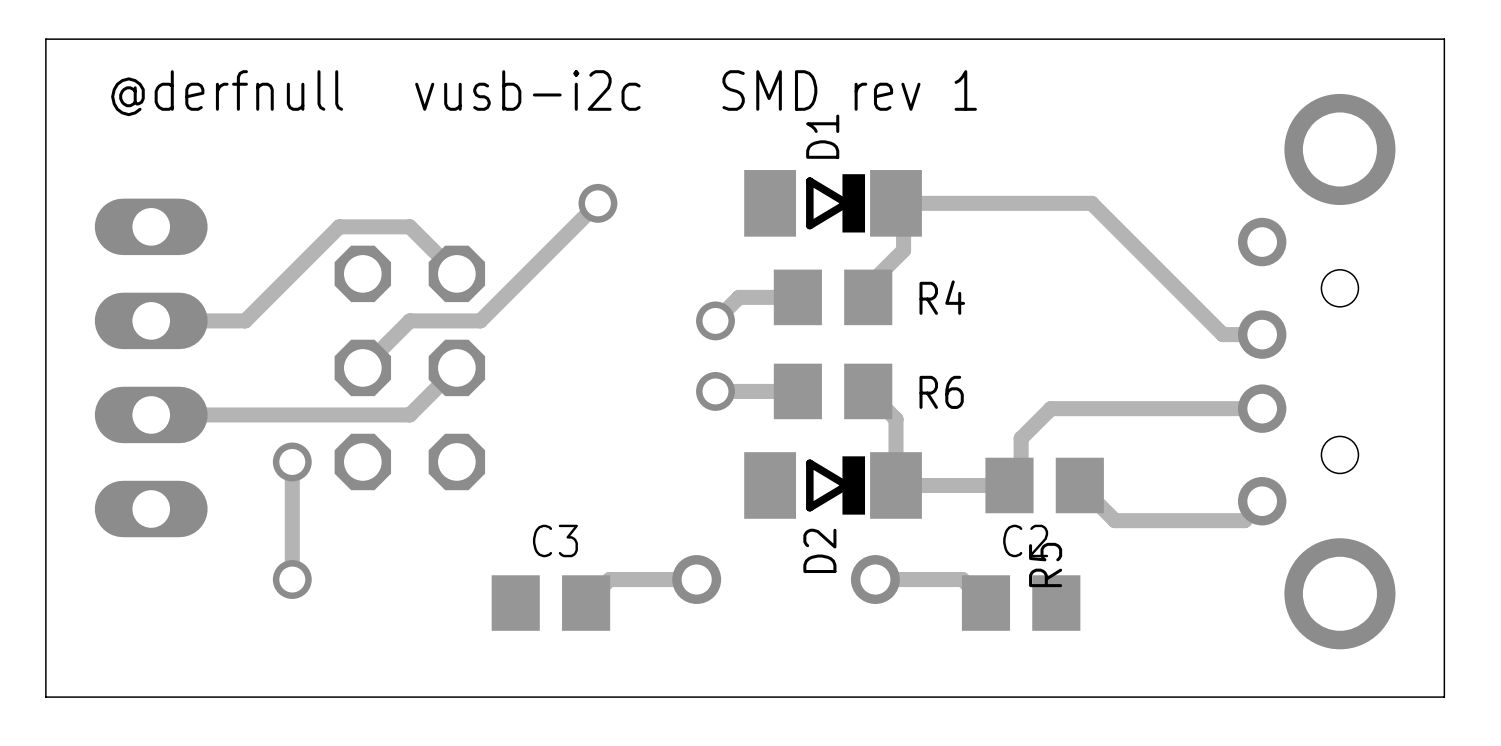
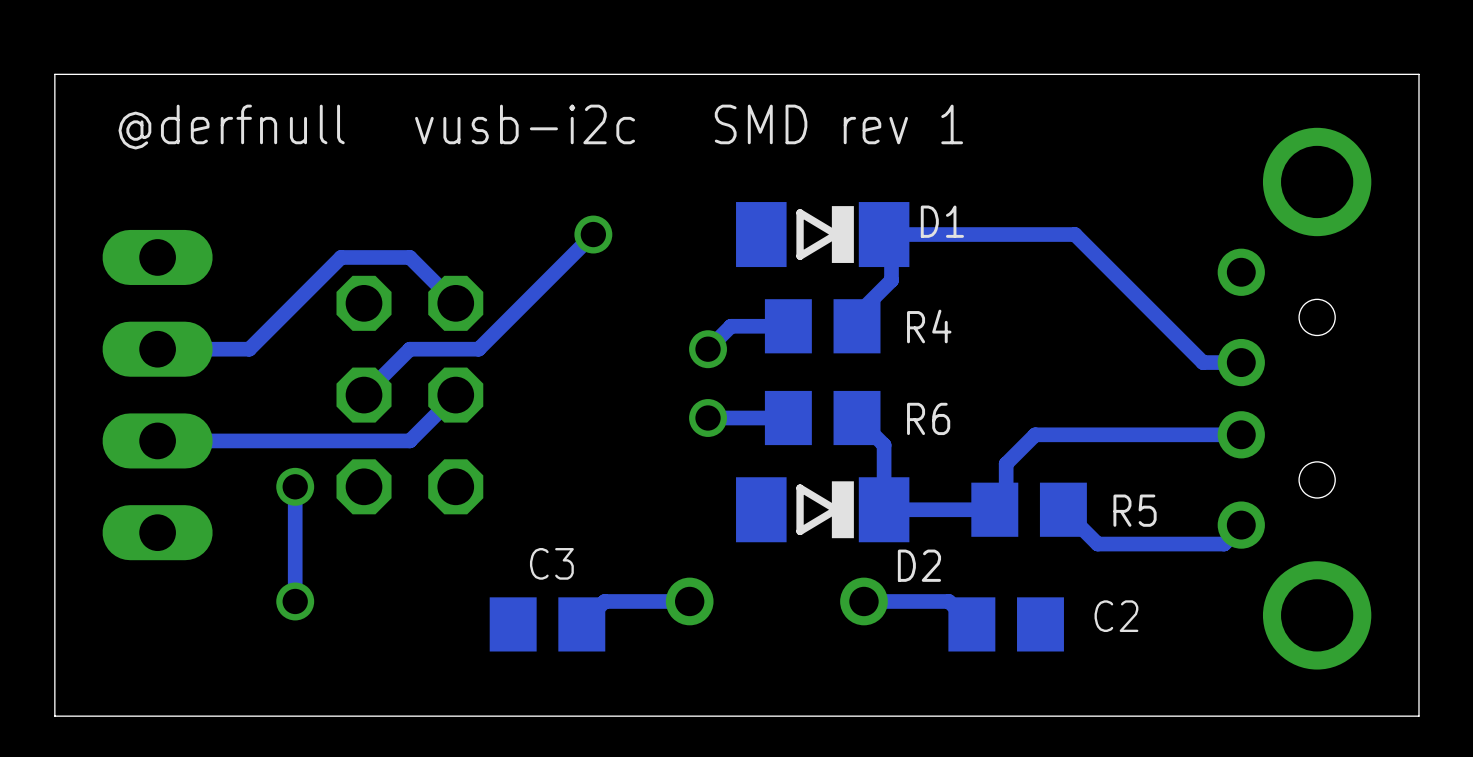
D1 name rotation: 0° (822, 136) -> 90° clockwise (942, 221)
D1 name position: D1 (822, 136) -> D1 (942, 221)
C2 name position: C2 (1025, 540) -> C2 (1116, 616)
D2 name rotation: 0° (819, 550) -> 90° clockwise (919, 565)
D2 name position: D2 (819, 550) -> D2 (919, 565)
R5 name rotation: 0° (1045, 564) -> 90° clockwise (1135, 510)
R5 name position: R5 (1045, 564) -> R5 (1135, 510)

